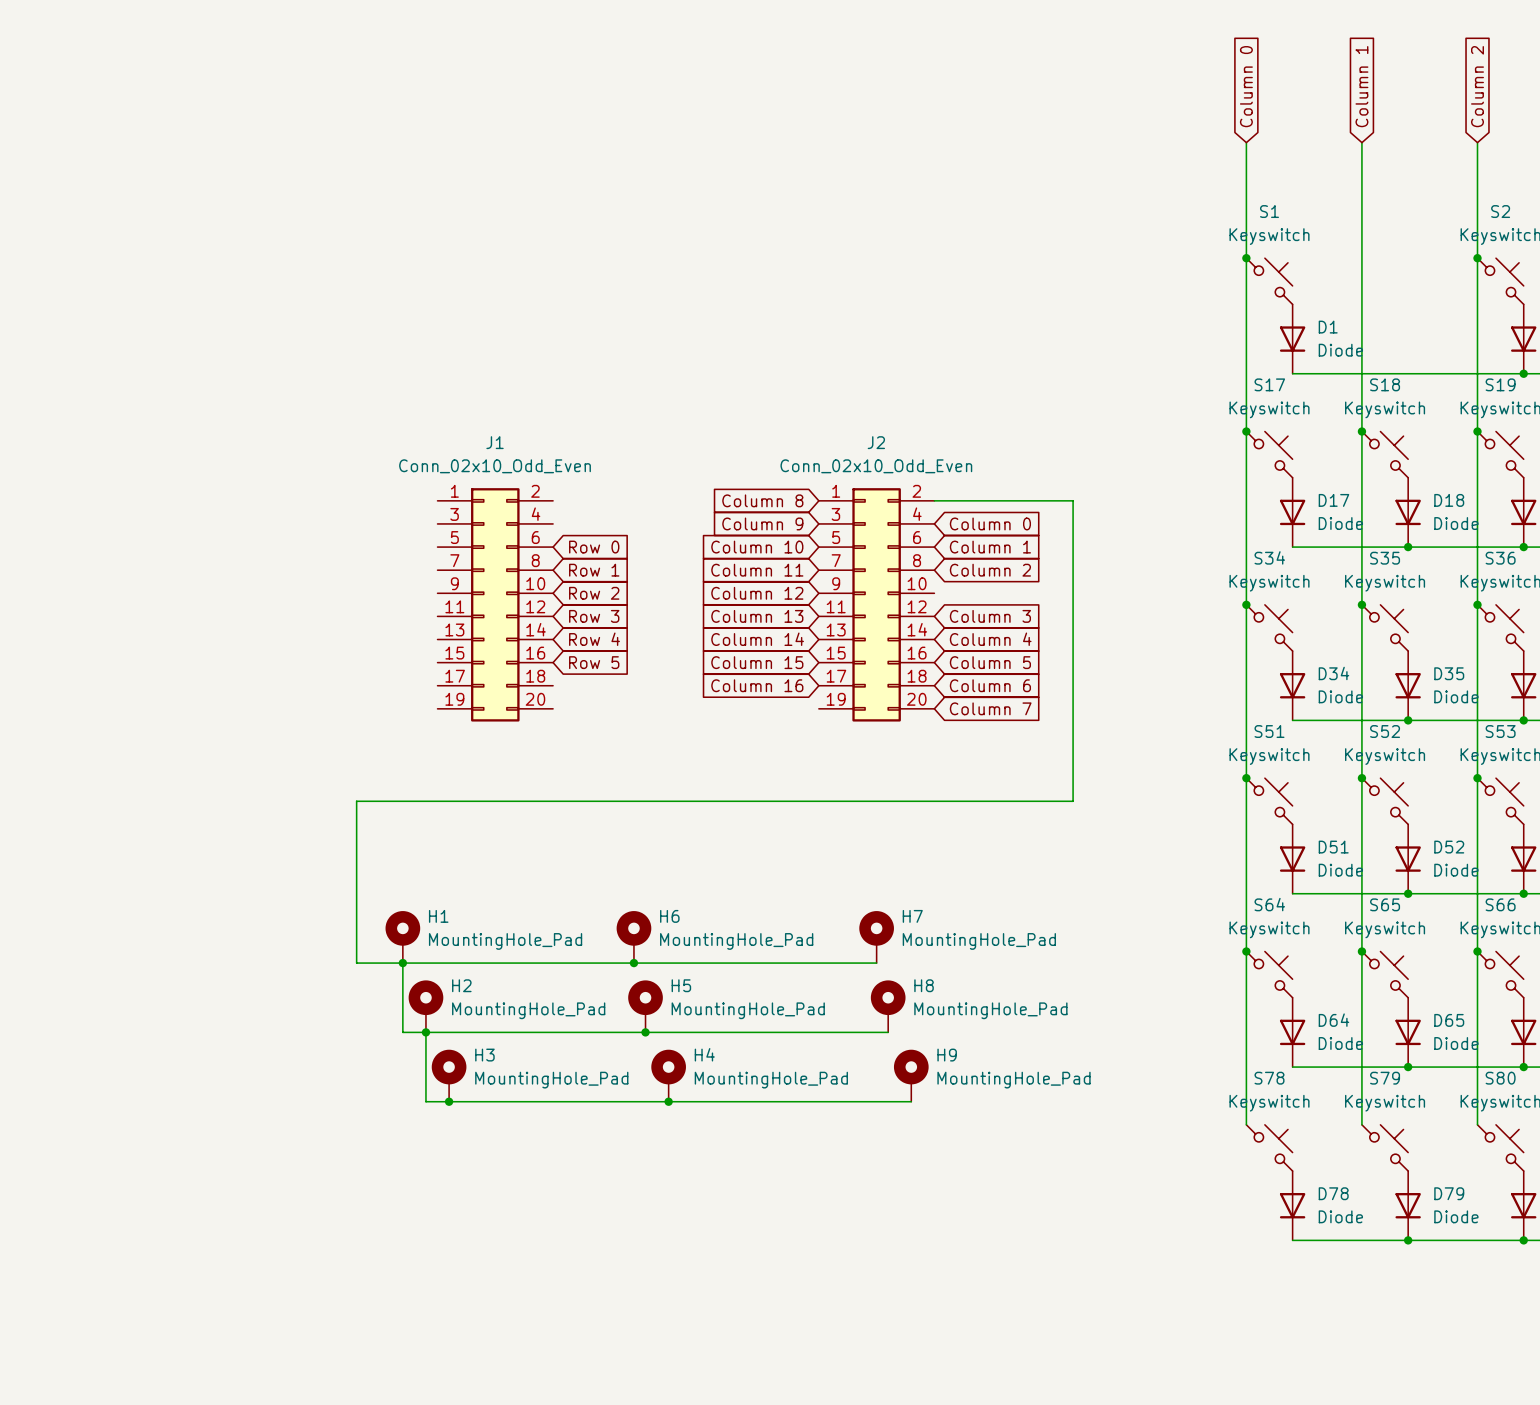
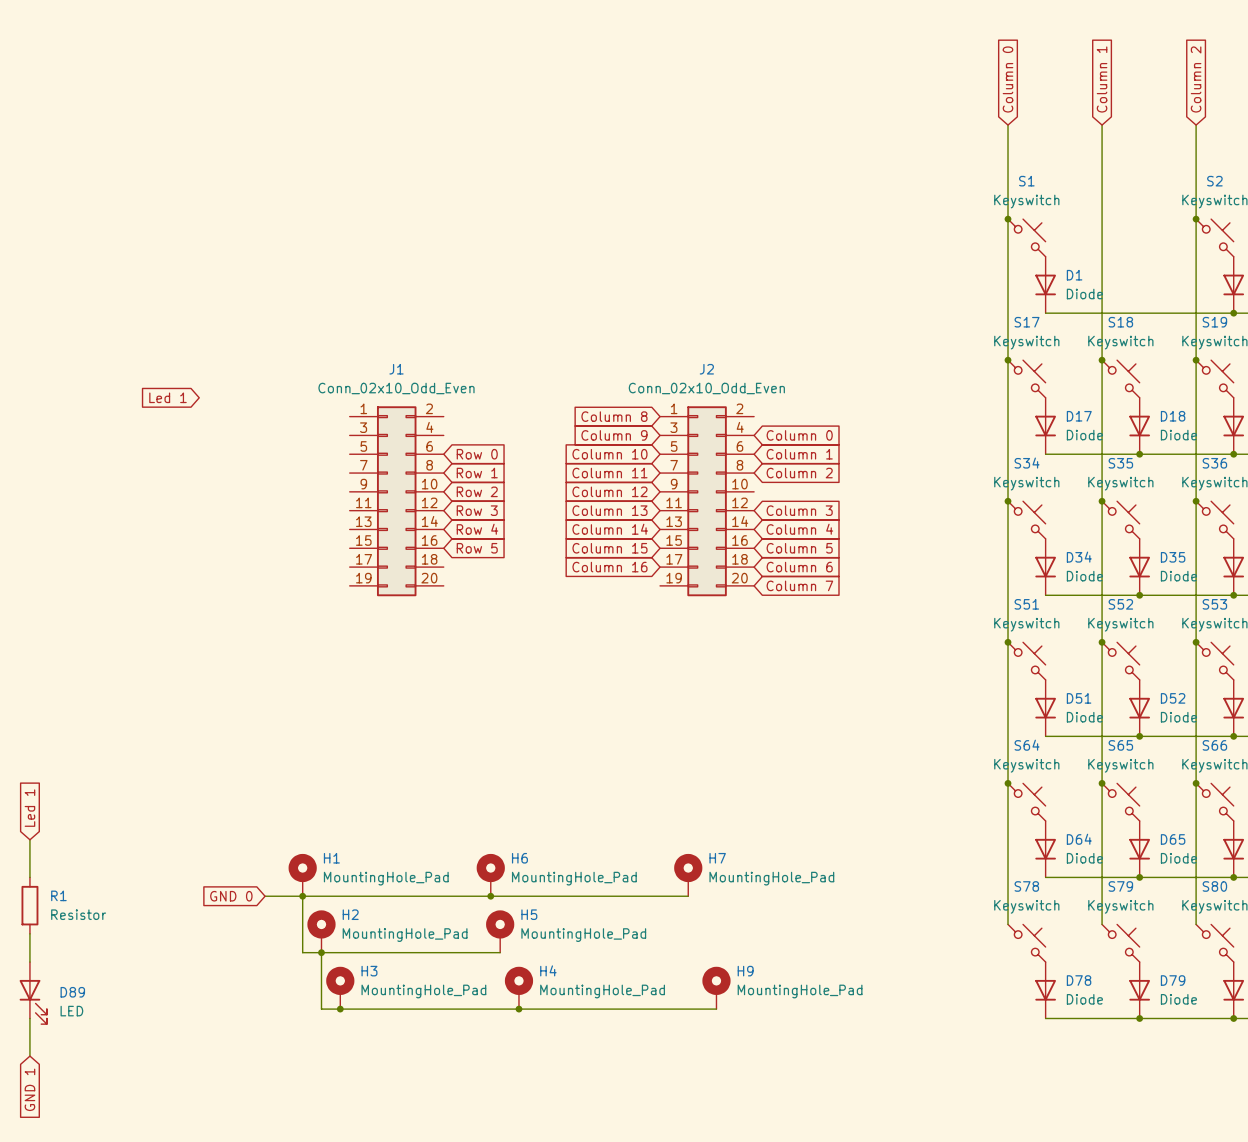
global label: none -> Led 1 (167, 397)
wire: (934, 500) (1073, 500) (1073, 801) (356, 801) (356, 963) (876, 963) -> none
H1 position: (402, 937) -> (302, 875)
H6 position: (633, 937) -> (490, 875)
H7 position: (876, 937) -> (688, 875)
wire: (402, 963) (402, 1032) (888, 1032) -> none
junction: (402, 963) -> none
junction: (633, 963) -> none
global label: none -> Led 1 (29, 808)
H2 position: (425, 1006) -> (321, 931)
H5 position: (645, 1006) -> (500, 931)
H8: MountingHole_Pad (888, 1006) -> none
wire: none -> (29, 839) (29, 877)
wire: (425, 1032) (425, 1101) (911, 1101) -> (321, 952) (321, 1009) (716, 1009)
junction: (425, 1032) -> none
junction: (645, 1032) -> none
H3 position: (449, 1075) -> (340, 987)
H4 position: (668, 1075) -> (518, 987)
H9 position: (911, 1075) -> (716, 987)
global label: none -> GND 0 (231, 896)
wire: none -> (265, 896) (688, 896)
wire: none -> (302, 896) (302, 952) (500, 952)
junction: none -> (302, 896)
junction: none -> (490, 896)
R1: none -> Resistor (29, 905)
junction: (449, 1101) -> none
junction: (668, 1101) -> none
wire: none -> (29, 933) (29, 962)
junction: none -> (321, 952)
D89: none -> LED (33, 993)
junction: none -> (340, 1009)
junction: none -> (518, 1009)
wire: none -> (29, 1018) (29, 1056)
global label: none -> GND 1 (29, 1089)

